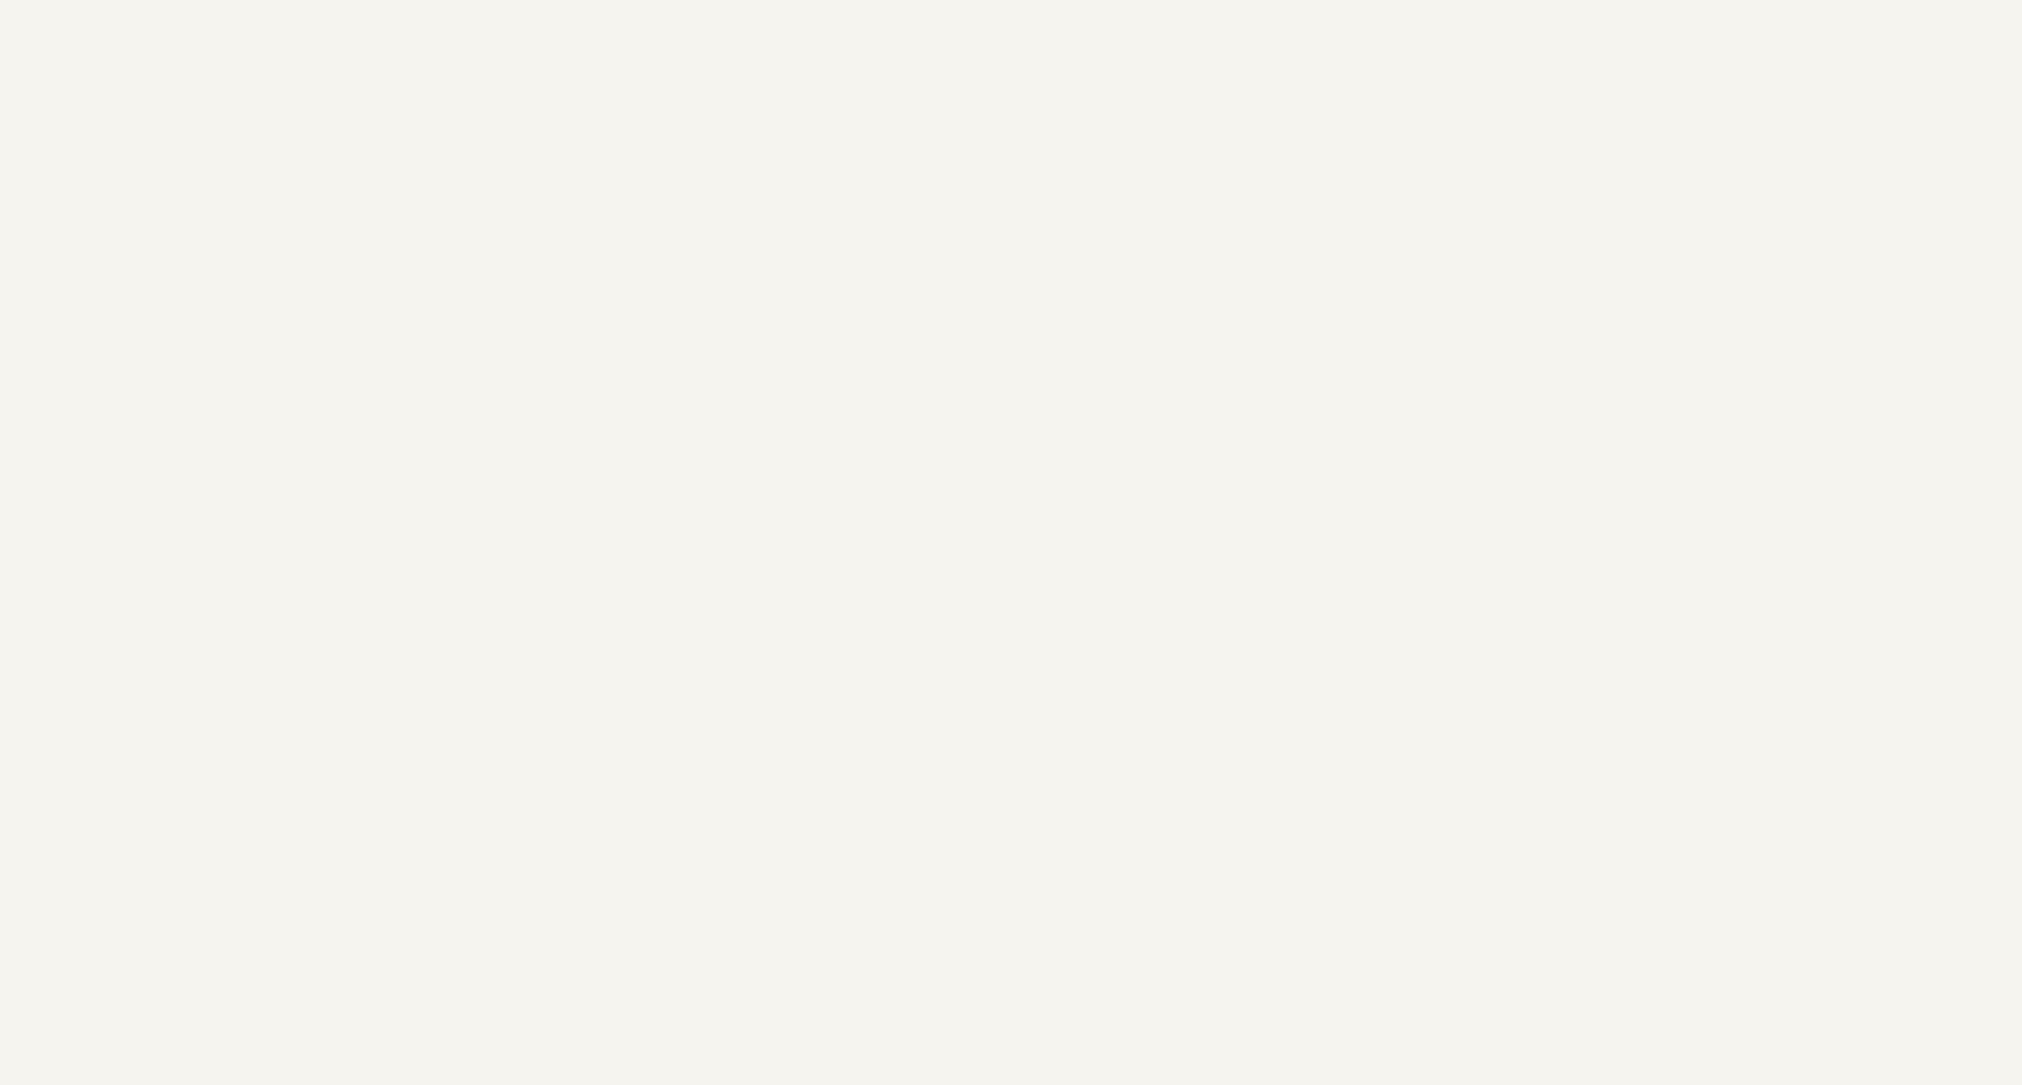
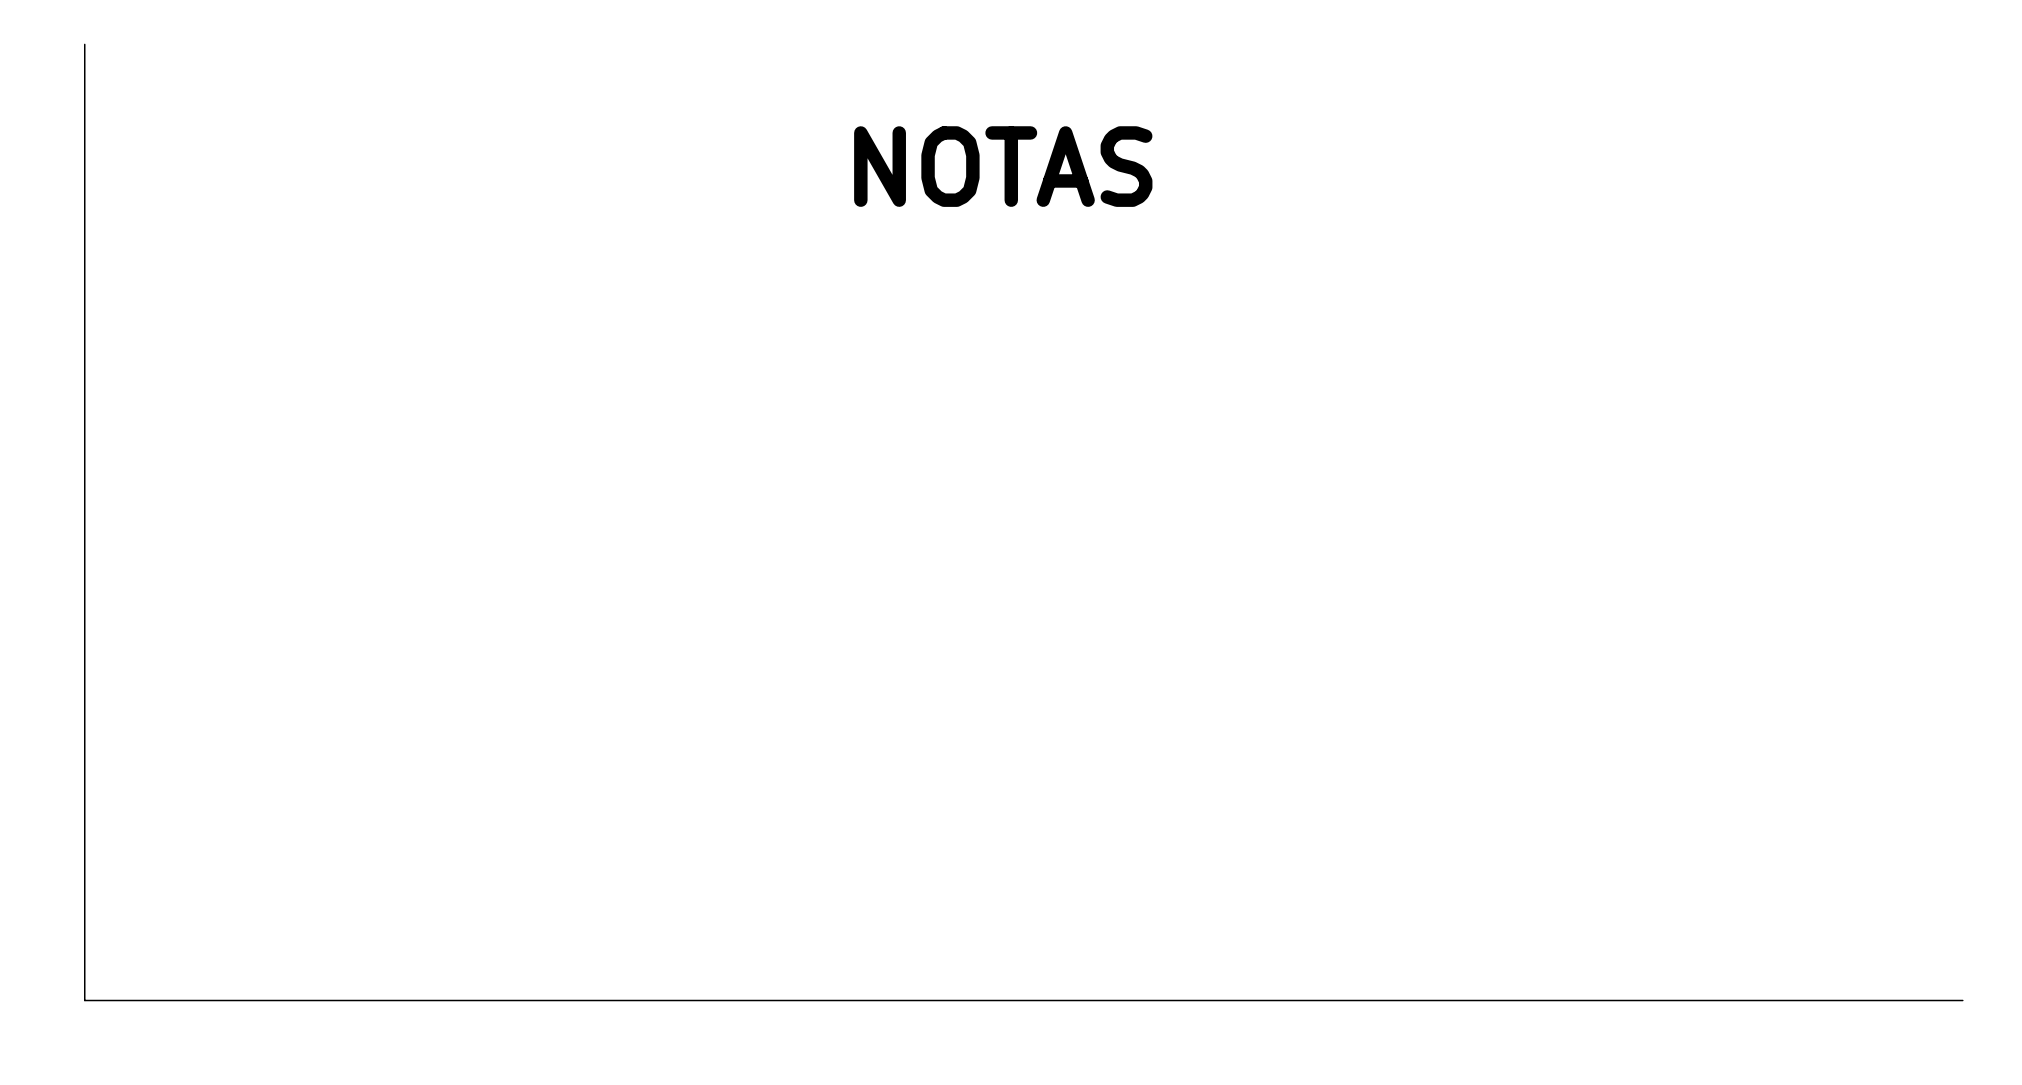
line: none -> (84, 44) (84, 1000) (1962, 1000)
text: none -> NOTAS (1003, 166)

